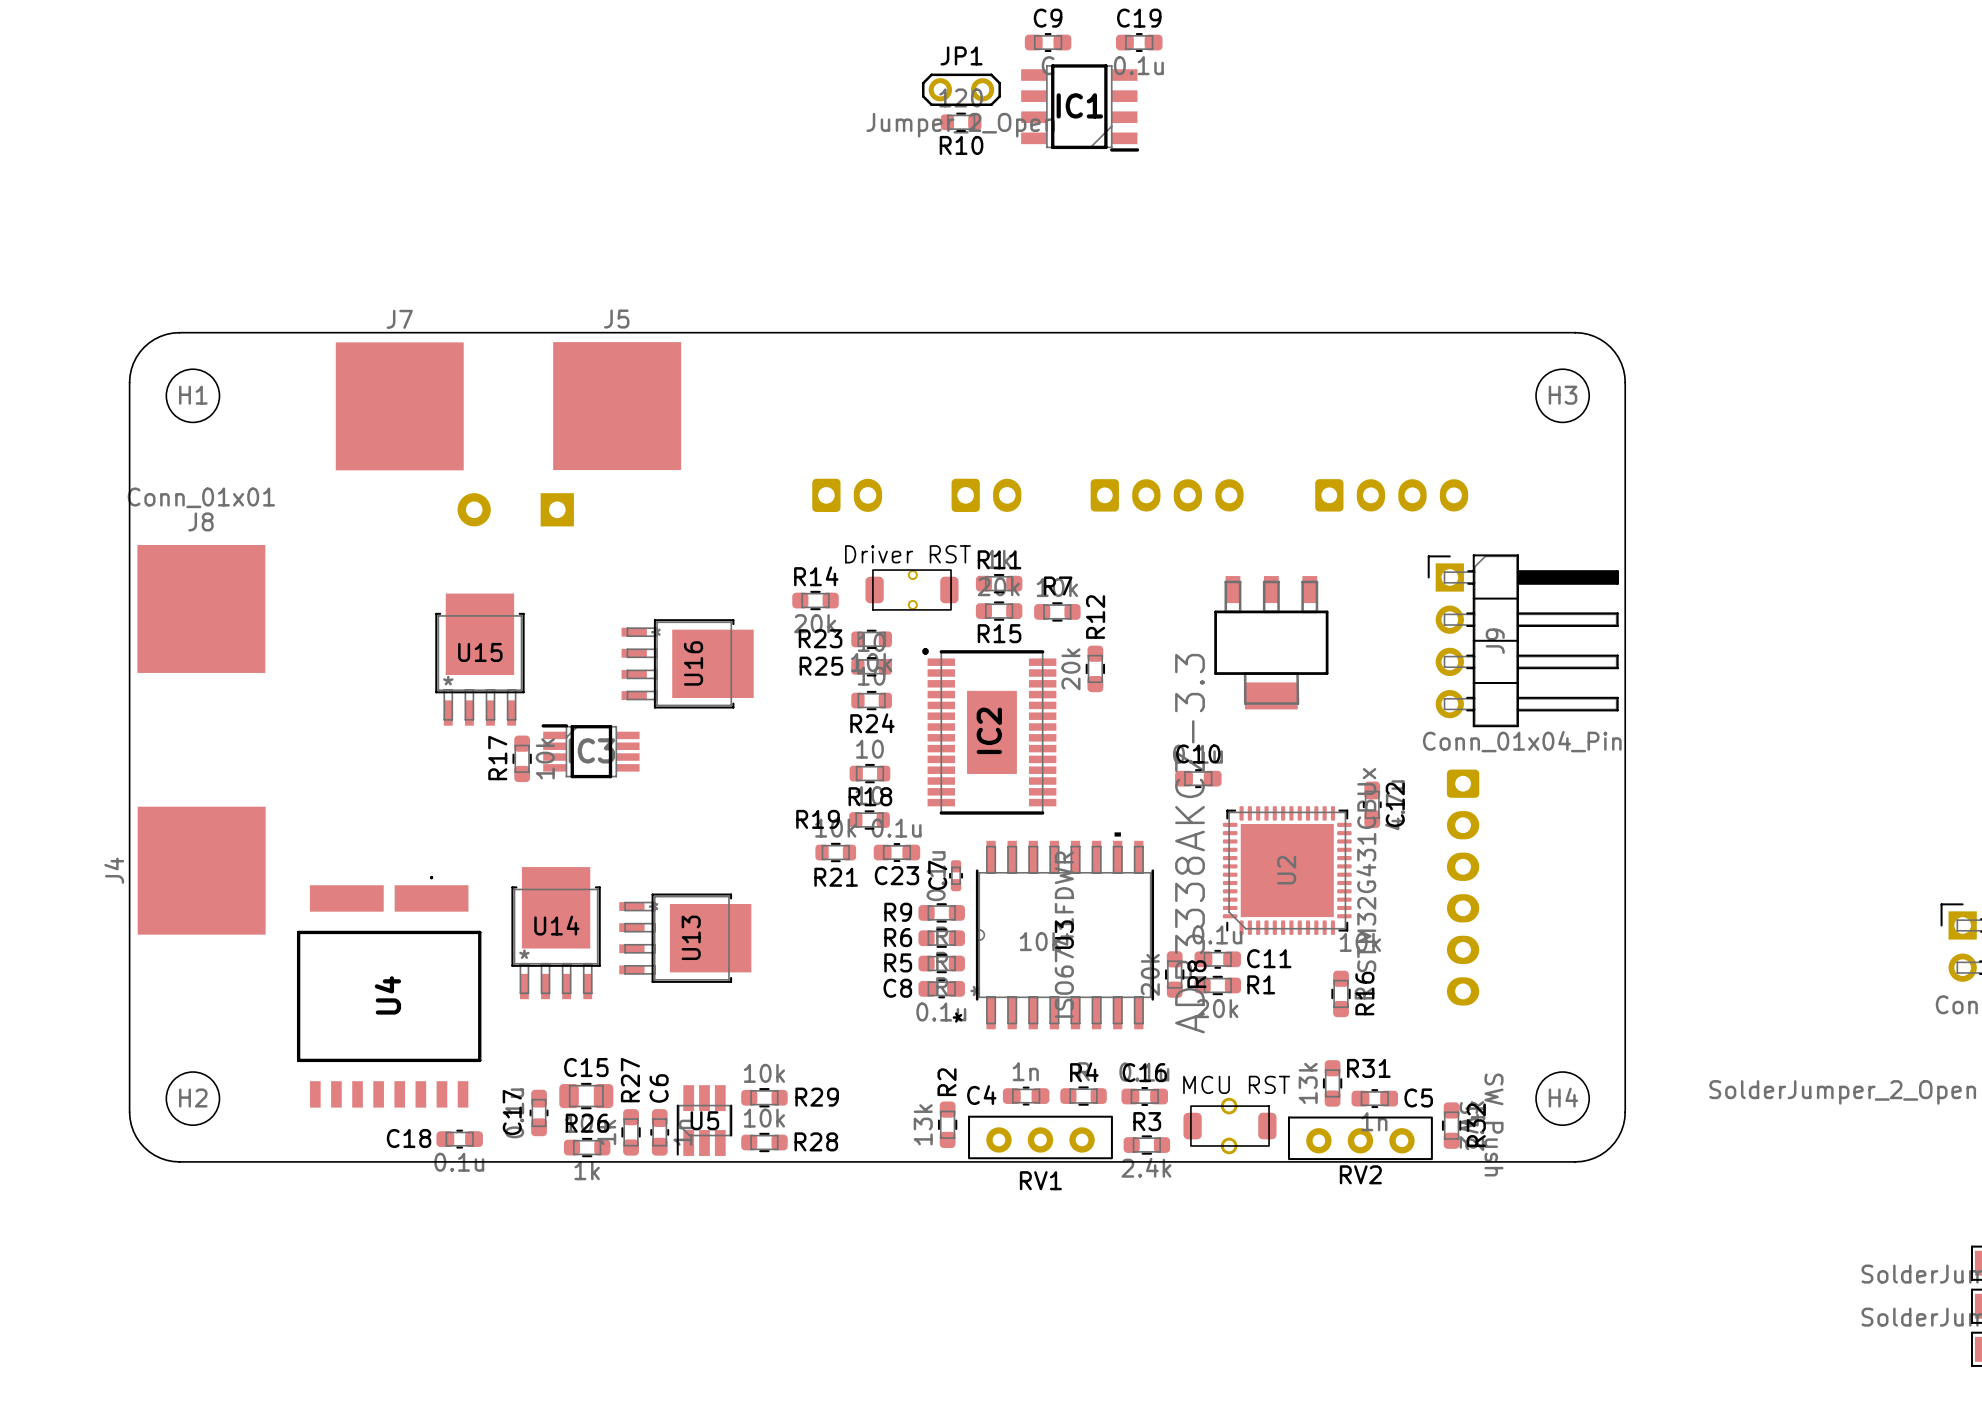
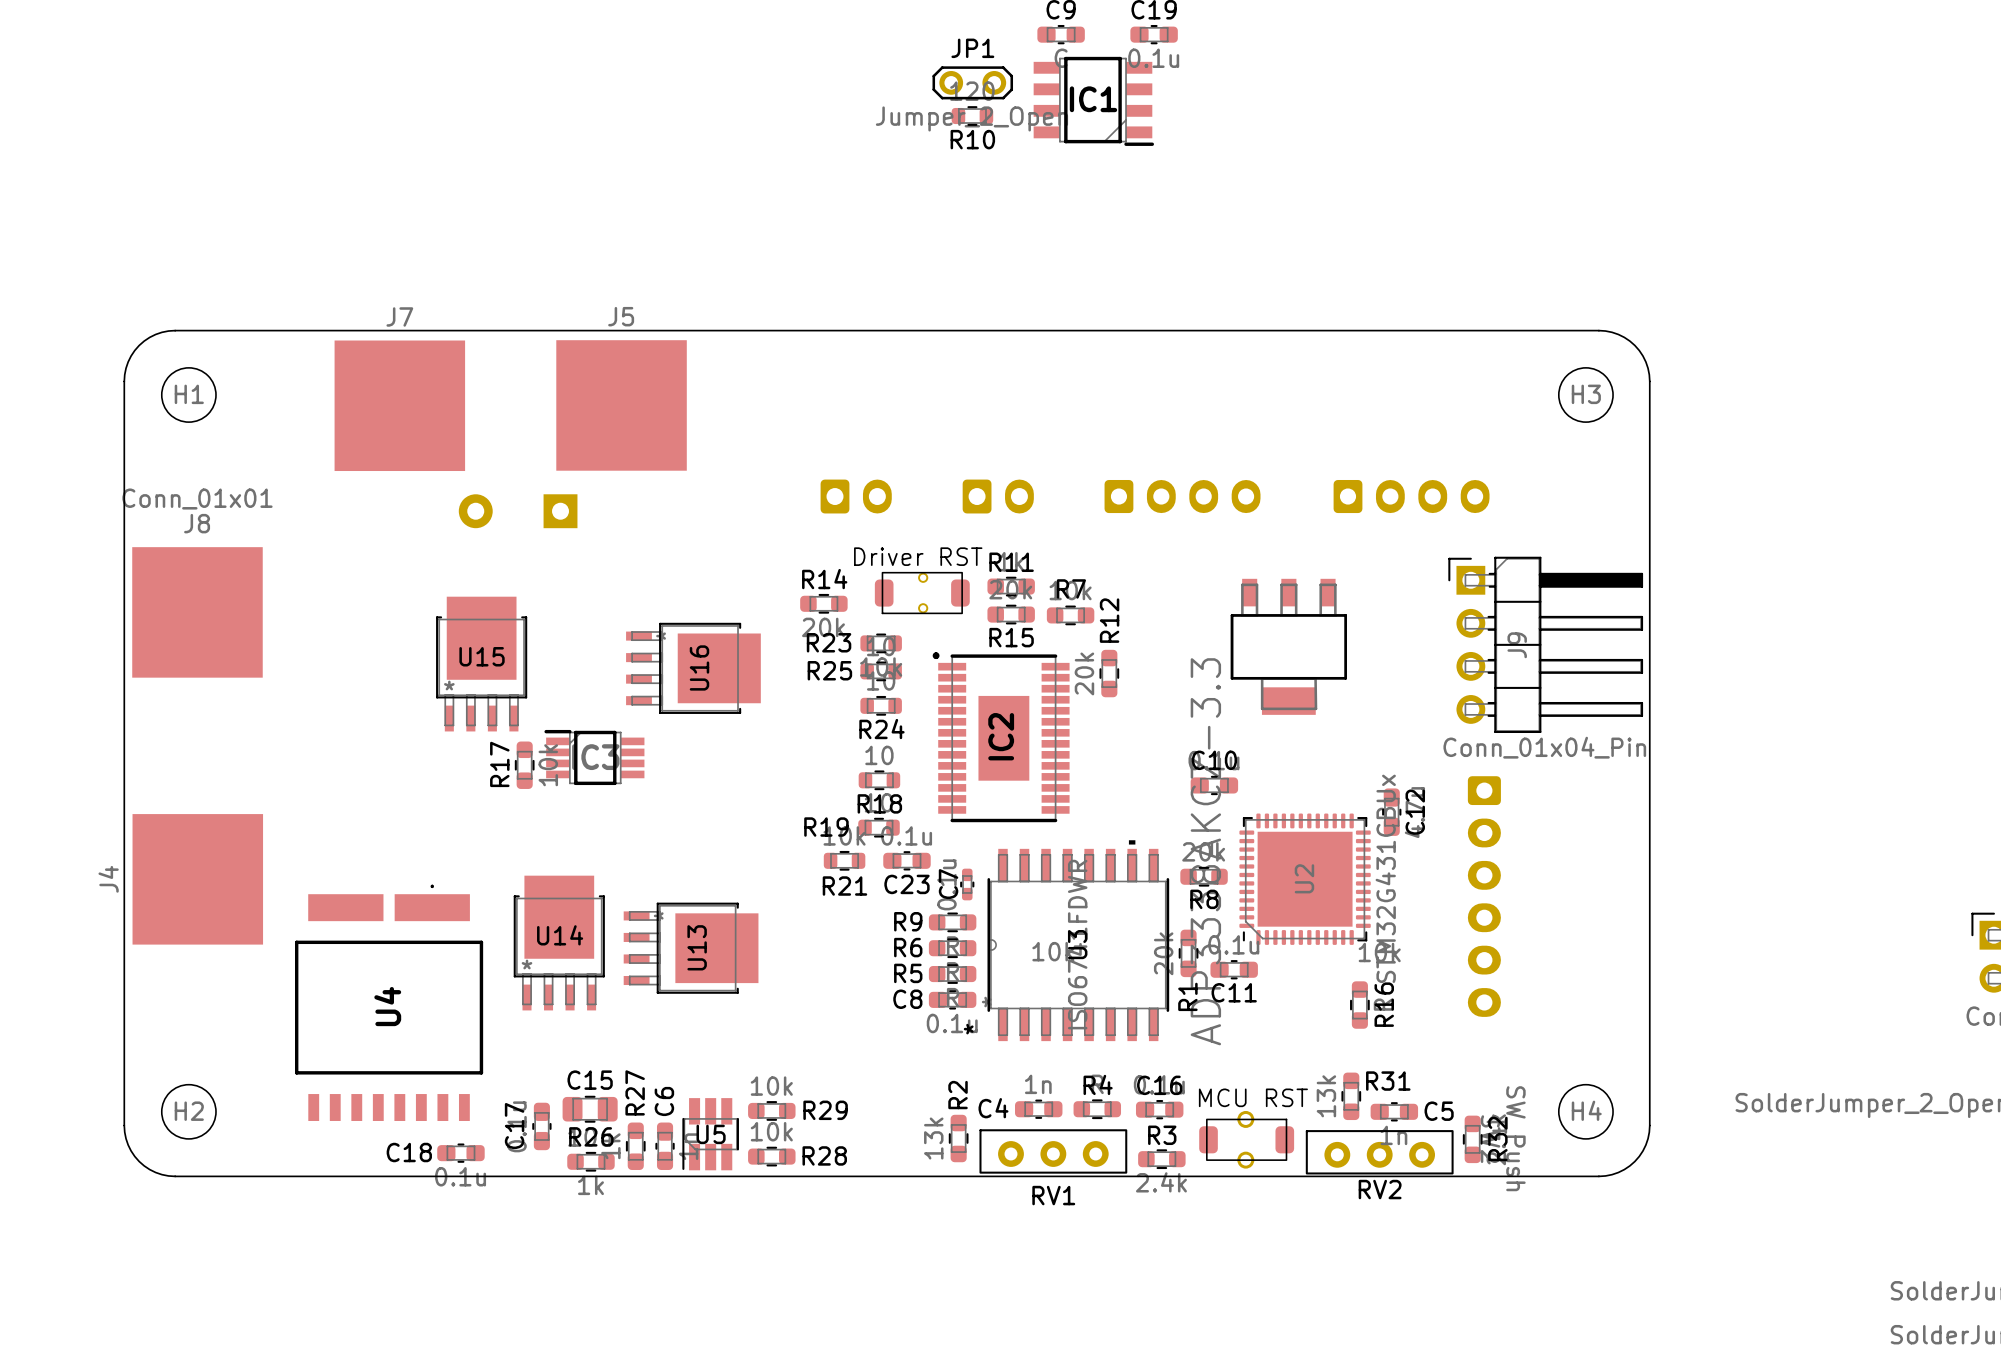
C11 name position: C11 (1269, 958) -> C11 (1234, 992)
R8 rotation: 0° (1174, 974) -> 90° clockwise (1204, 876)
R8 position: (1174, 974) -> (1204, 876)
R1 rotation: 0° (1217, 985) -> 90° clockwise (1188, 953)
R1 position: (1217, 985) -> (1188, 953)

